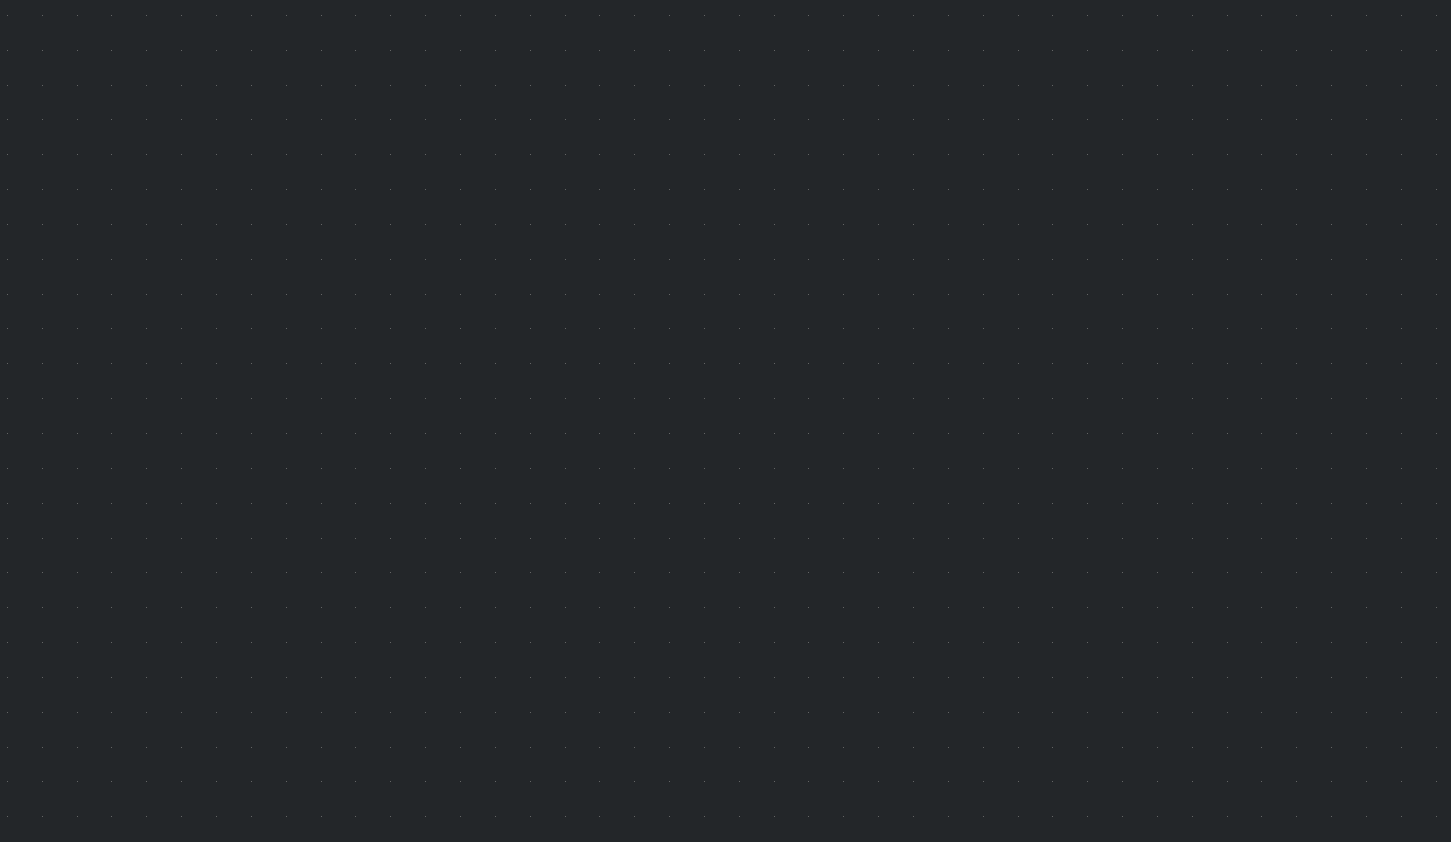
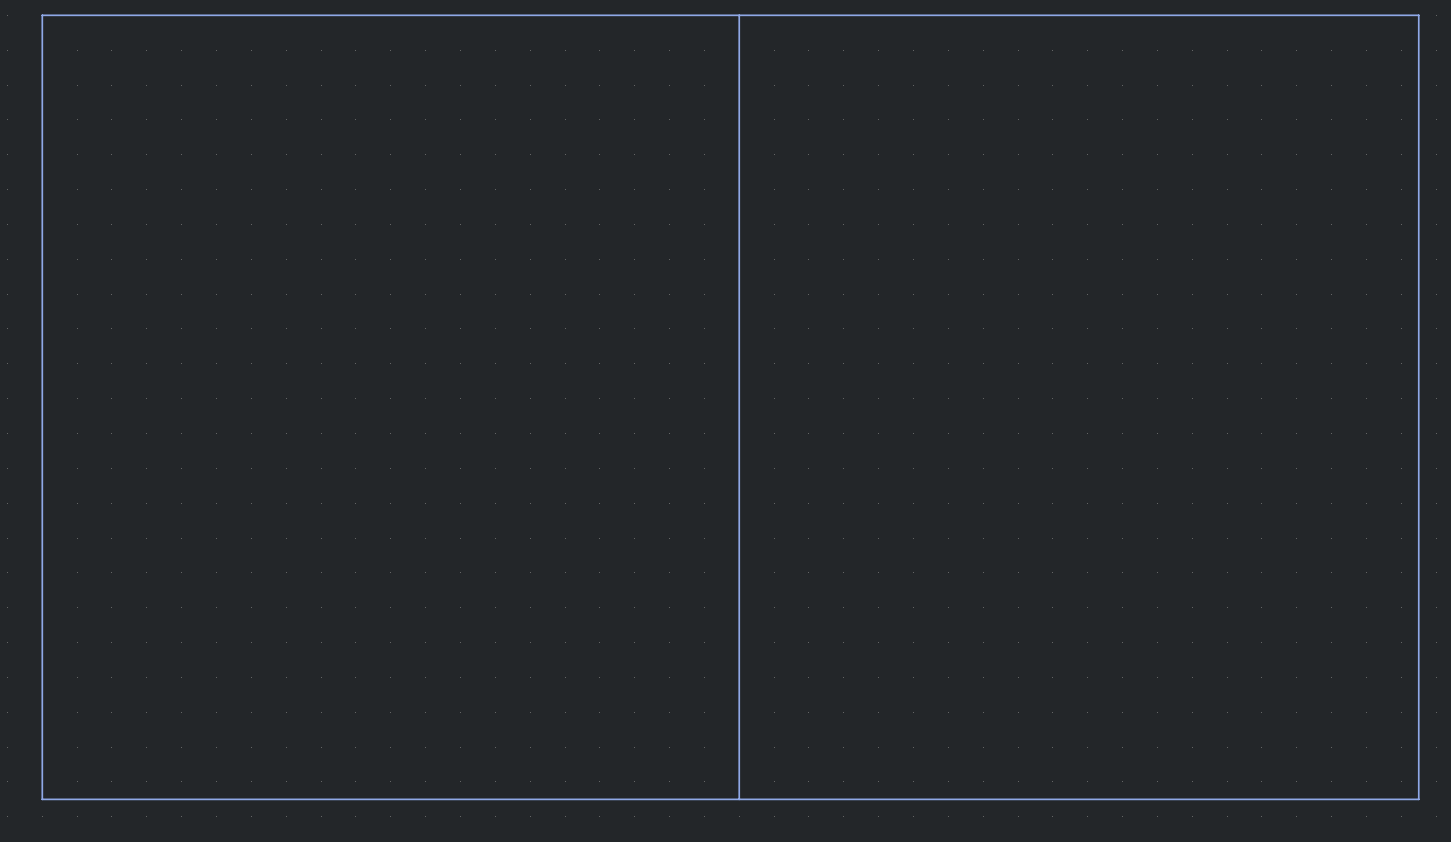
line: none -> (42, 15) (1418, 15) (1418, 799) (42, 799) (42, 15)
line: none -> (739, 15) (739, 799)

